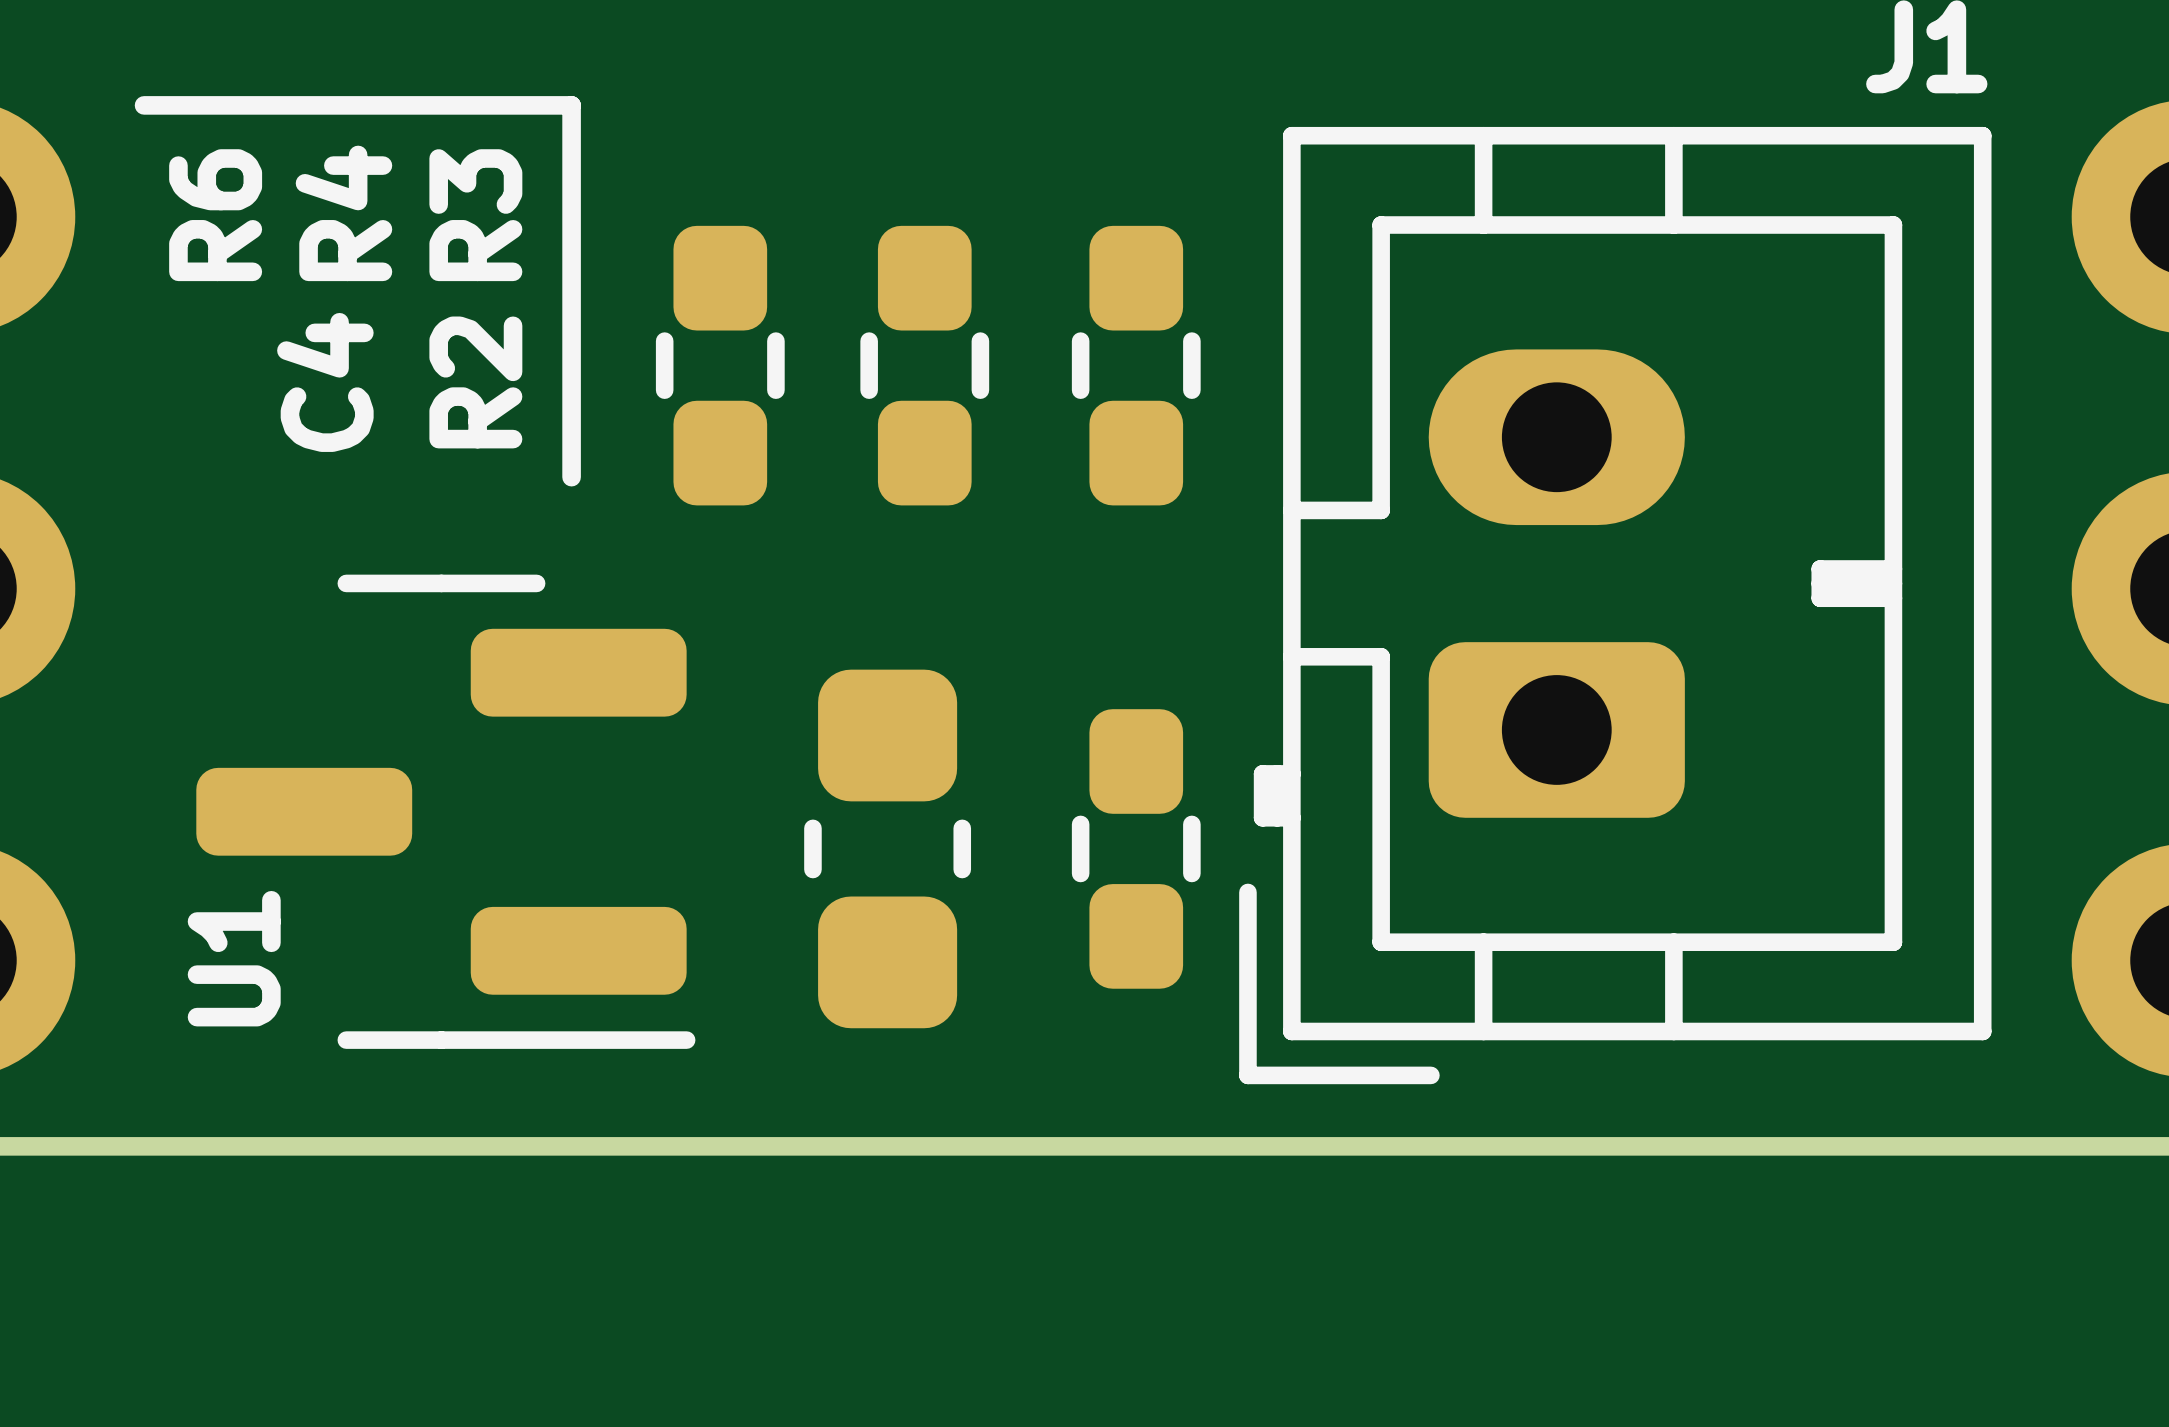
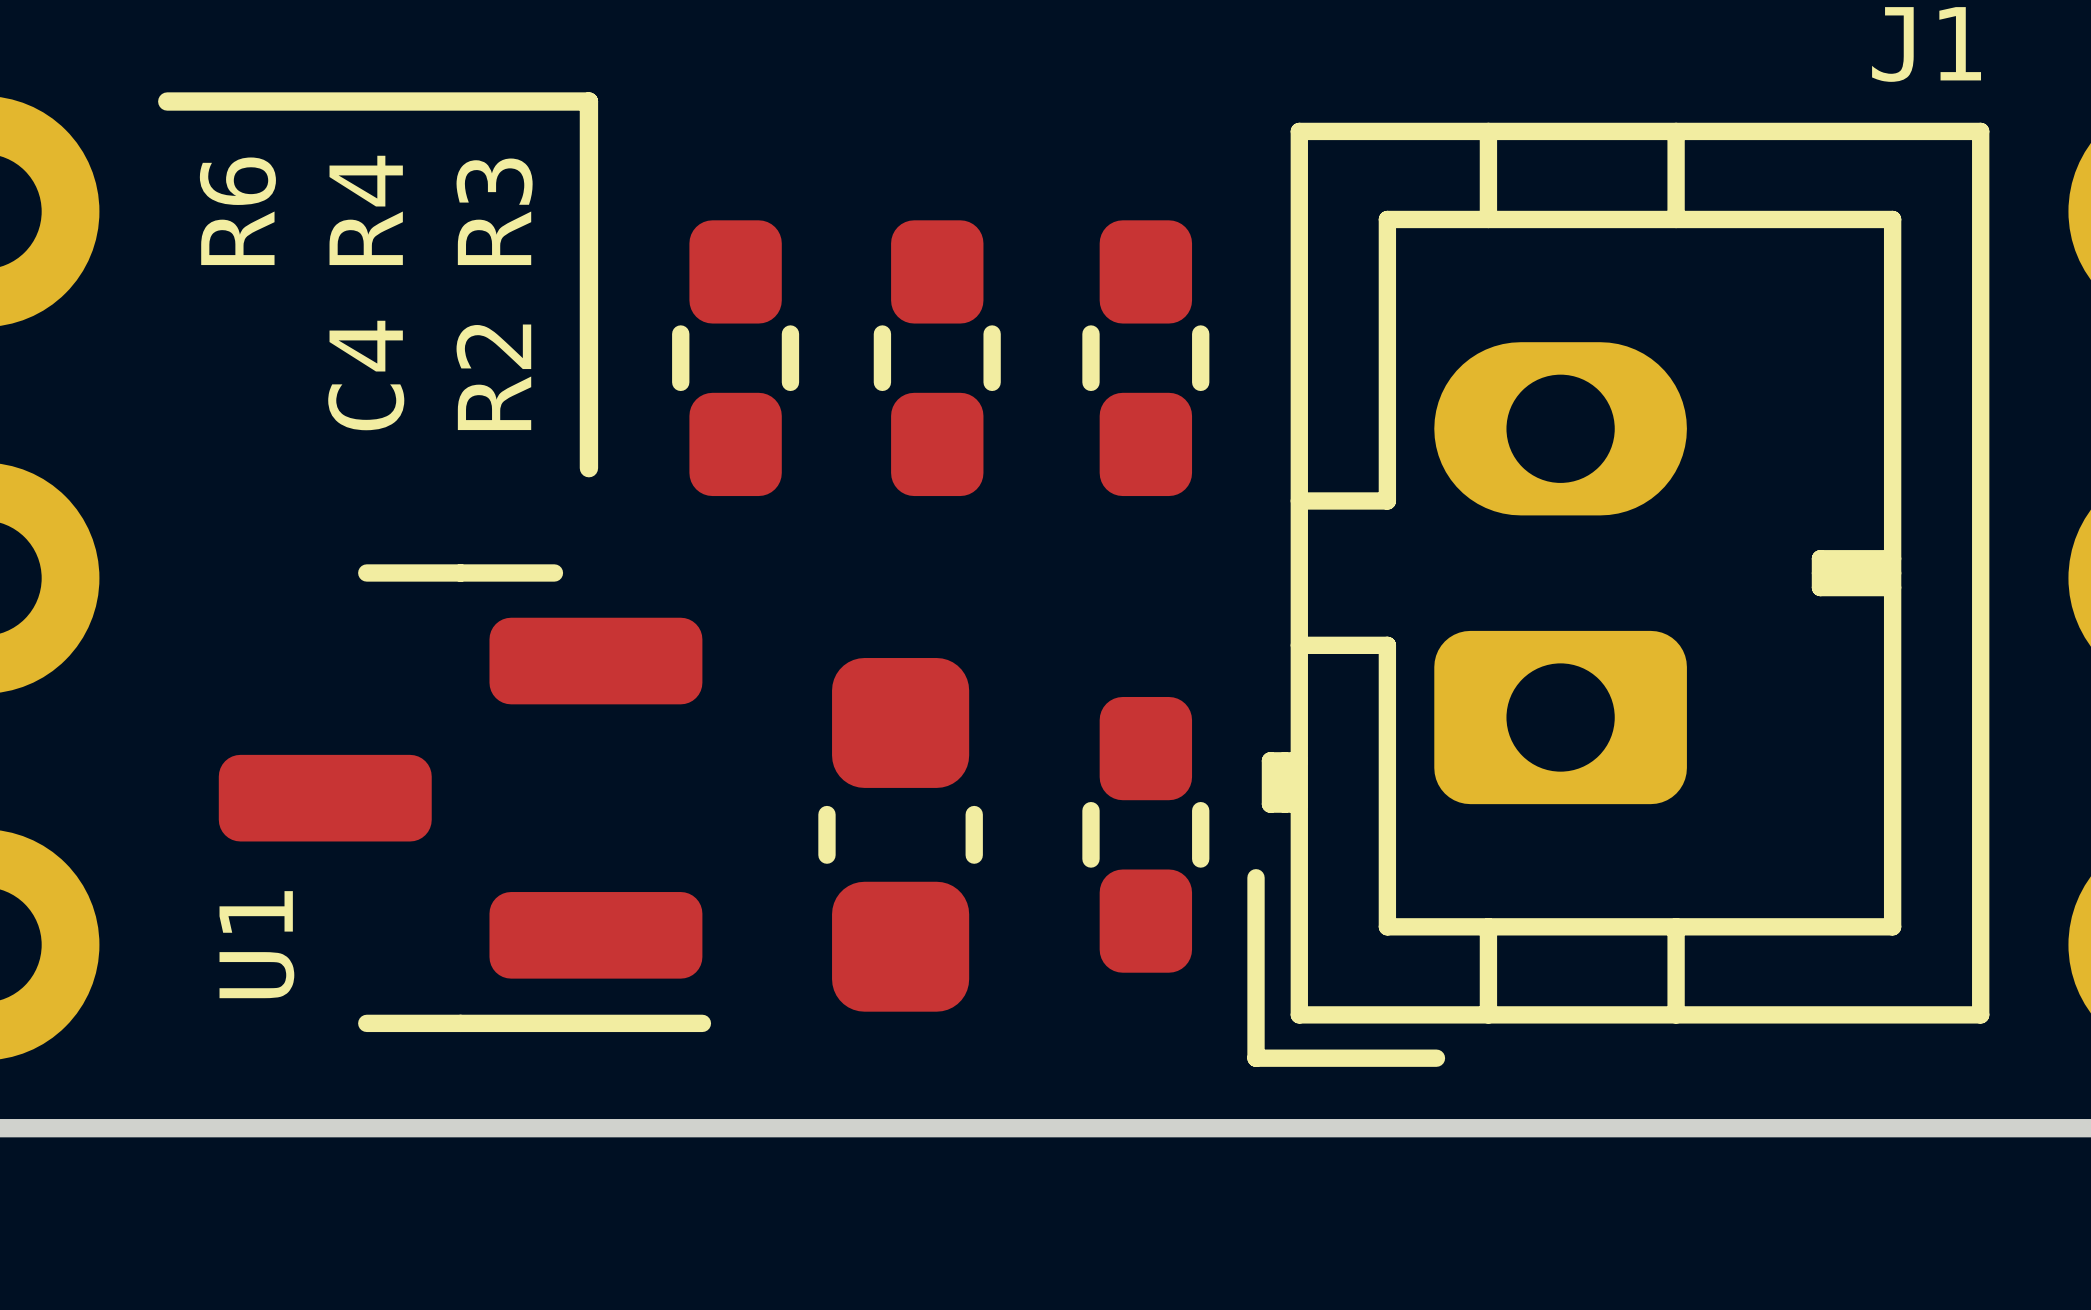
C4 name position: C4 (325, 382) -> C4 (366, 375)

